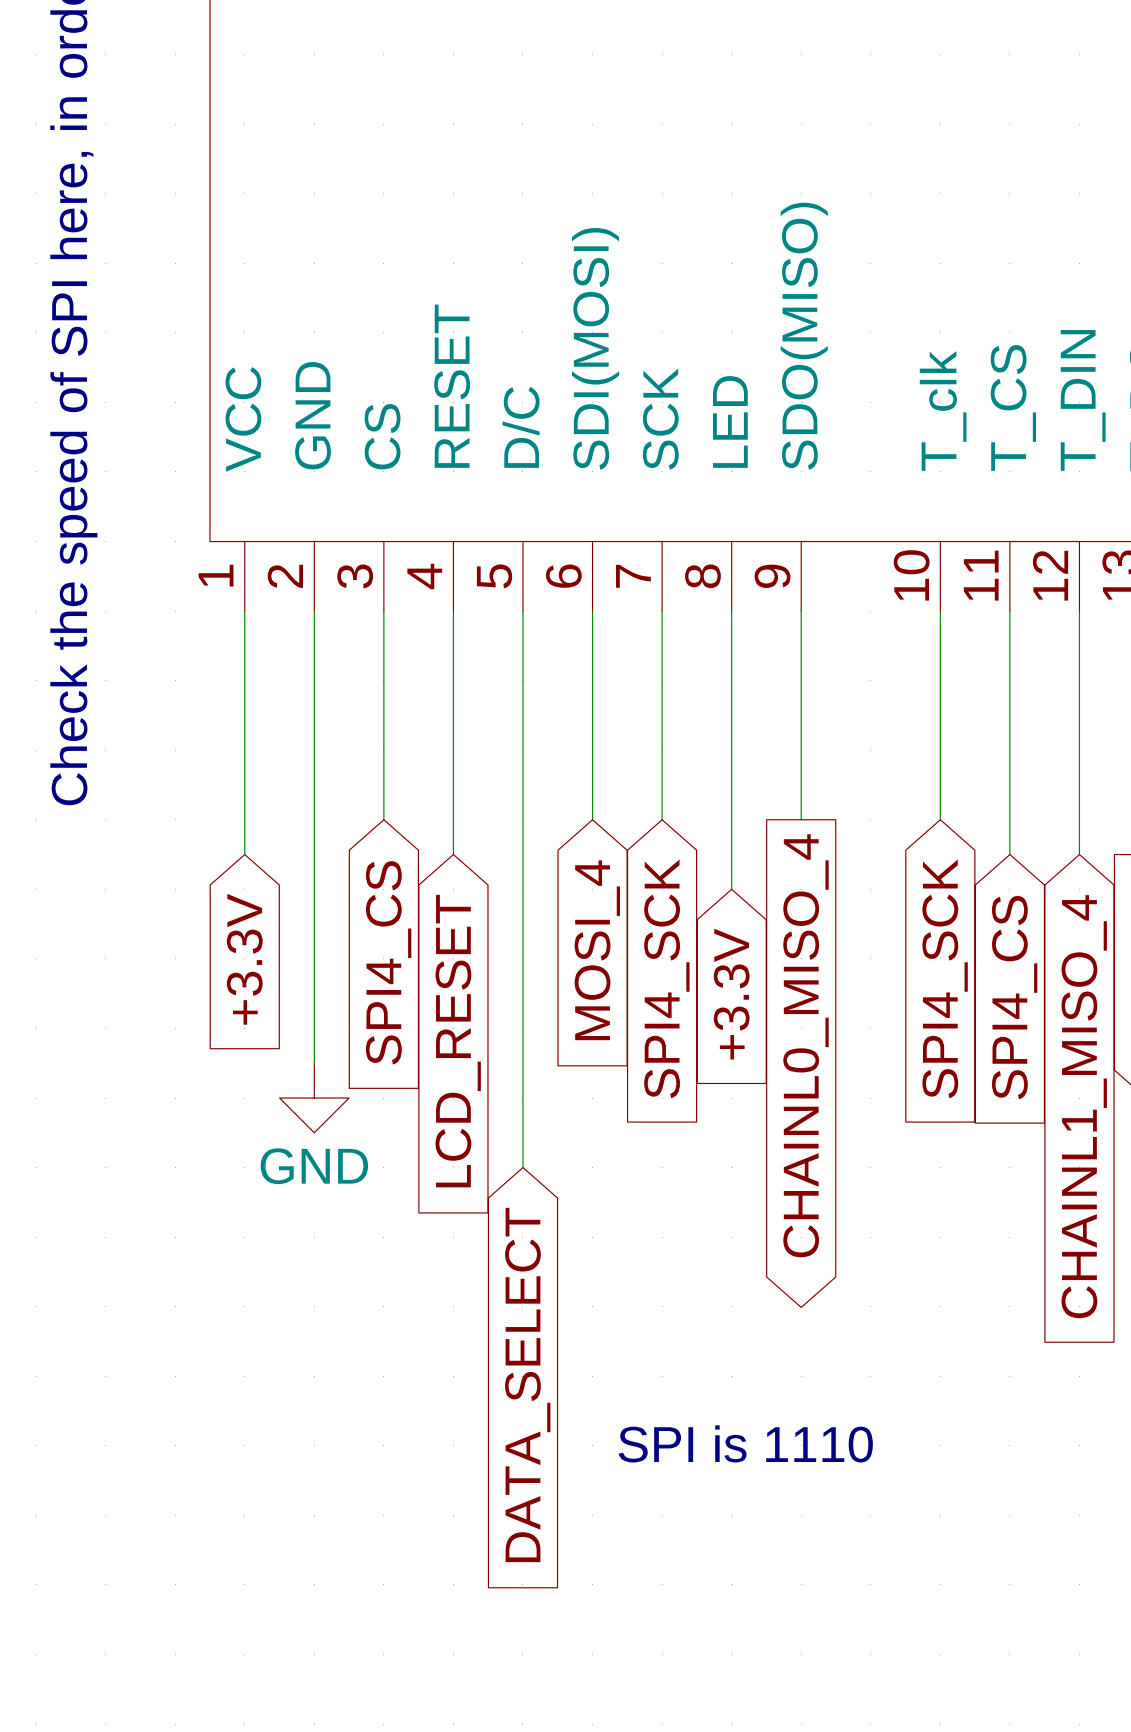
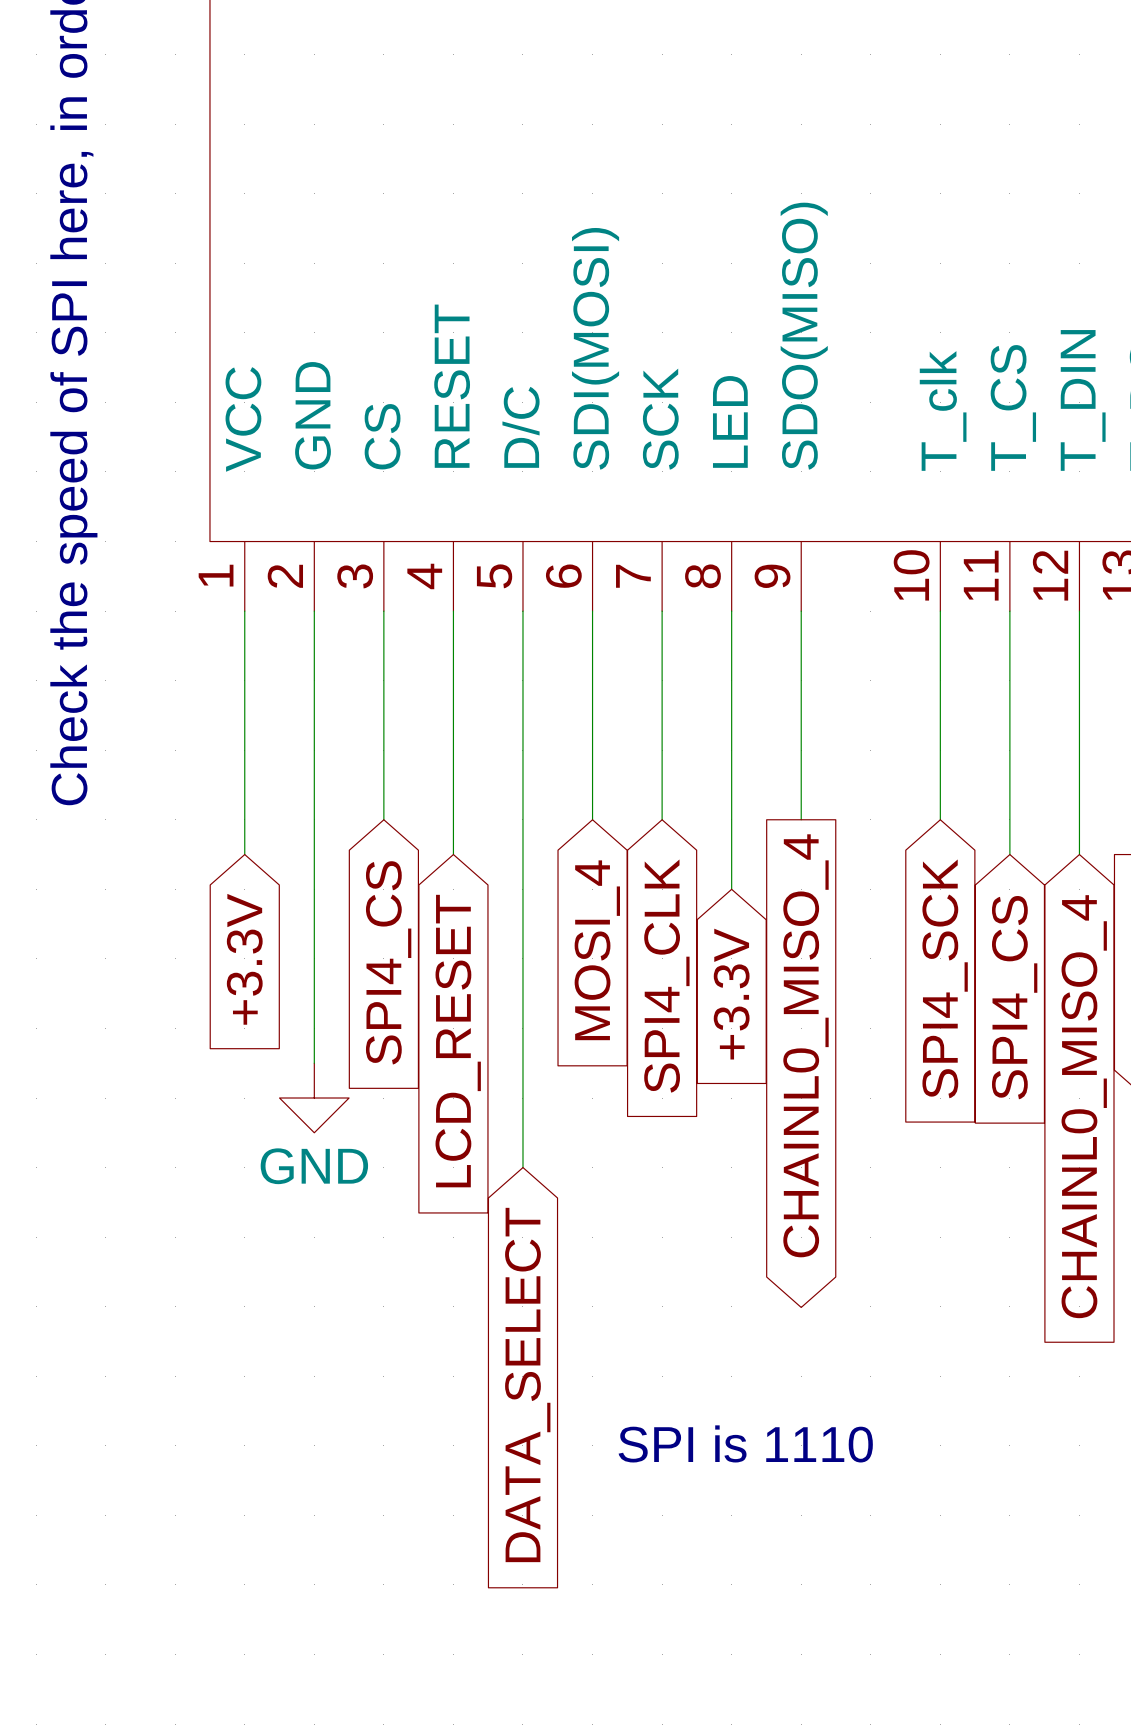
global label: SPI4_SCK (666, 978) -> SPI4_CLK (666, 976)
global label: CHAINL1_MISO_4 (1084, 1106) -> CHAINL0_MISO_4 (1084, 1106)

